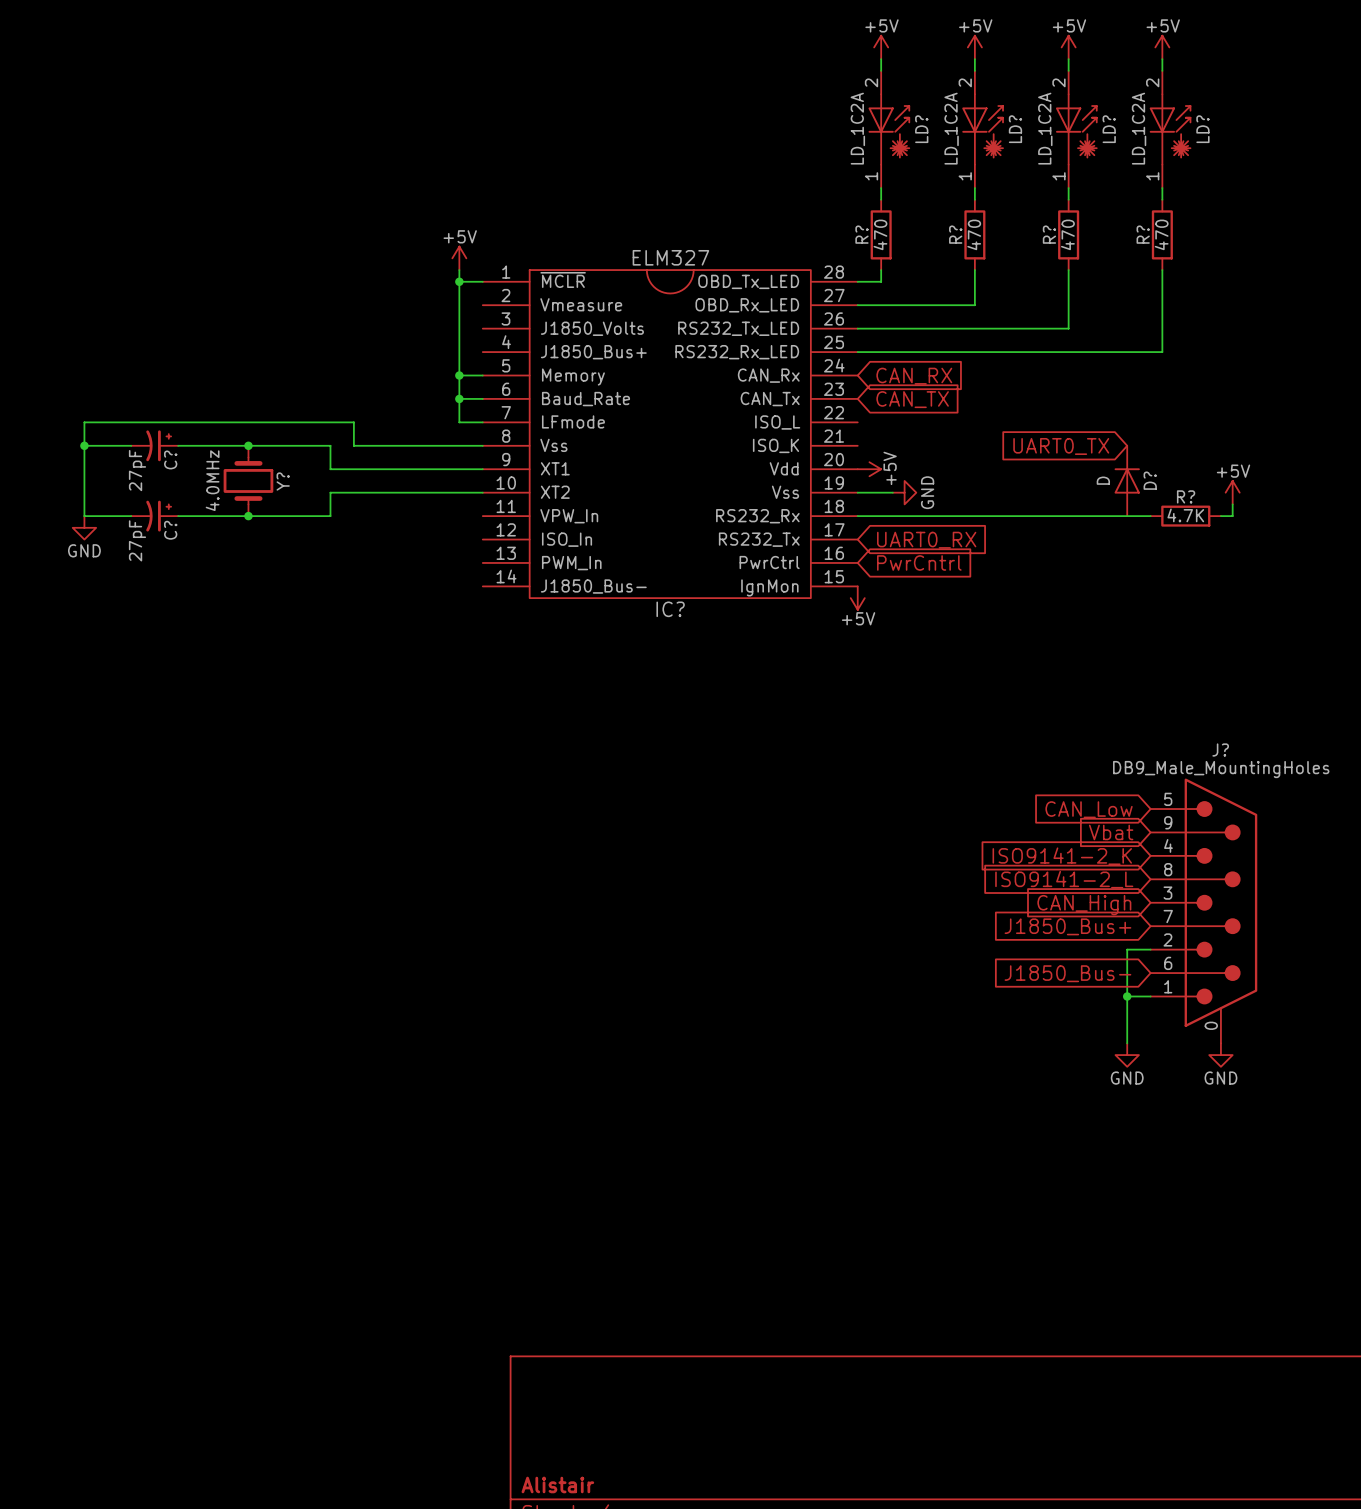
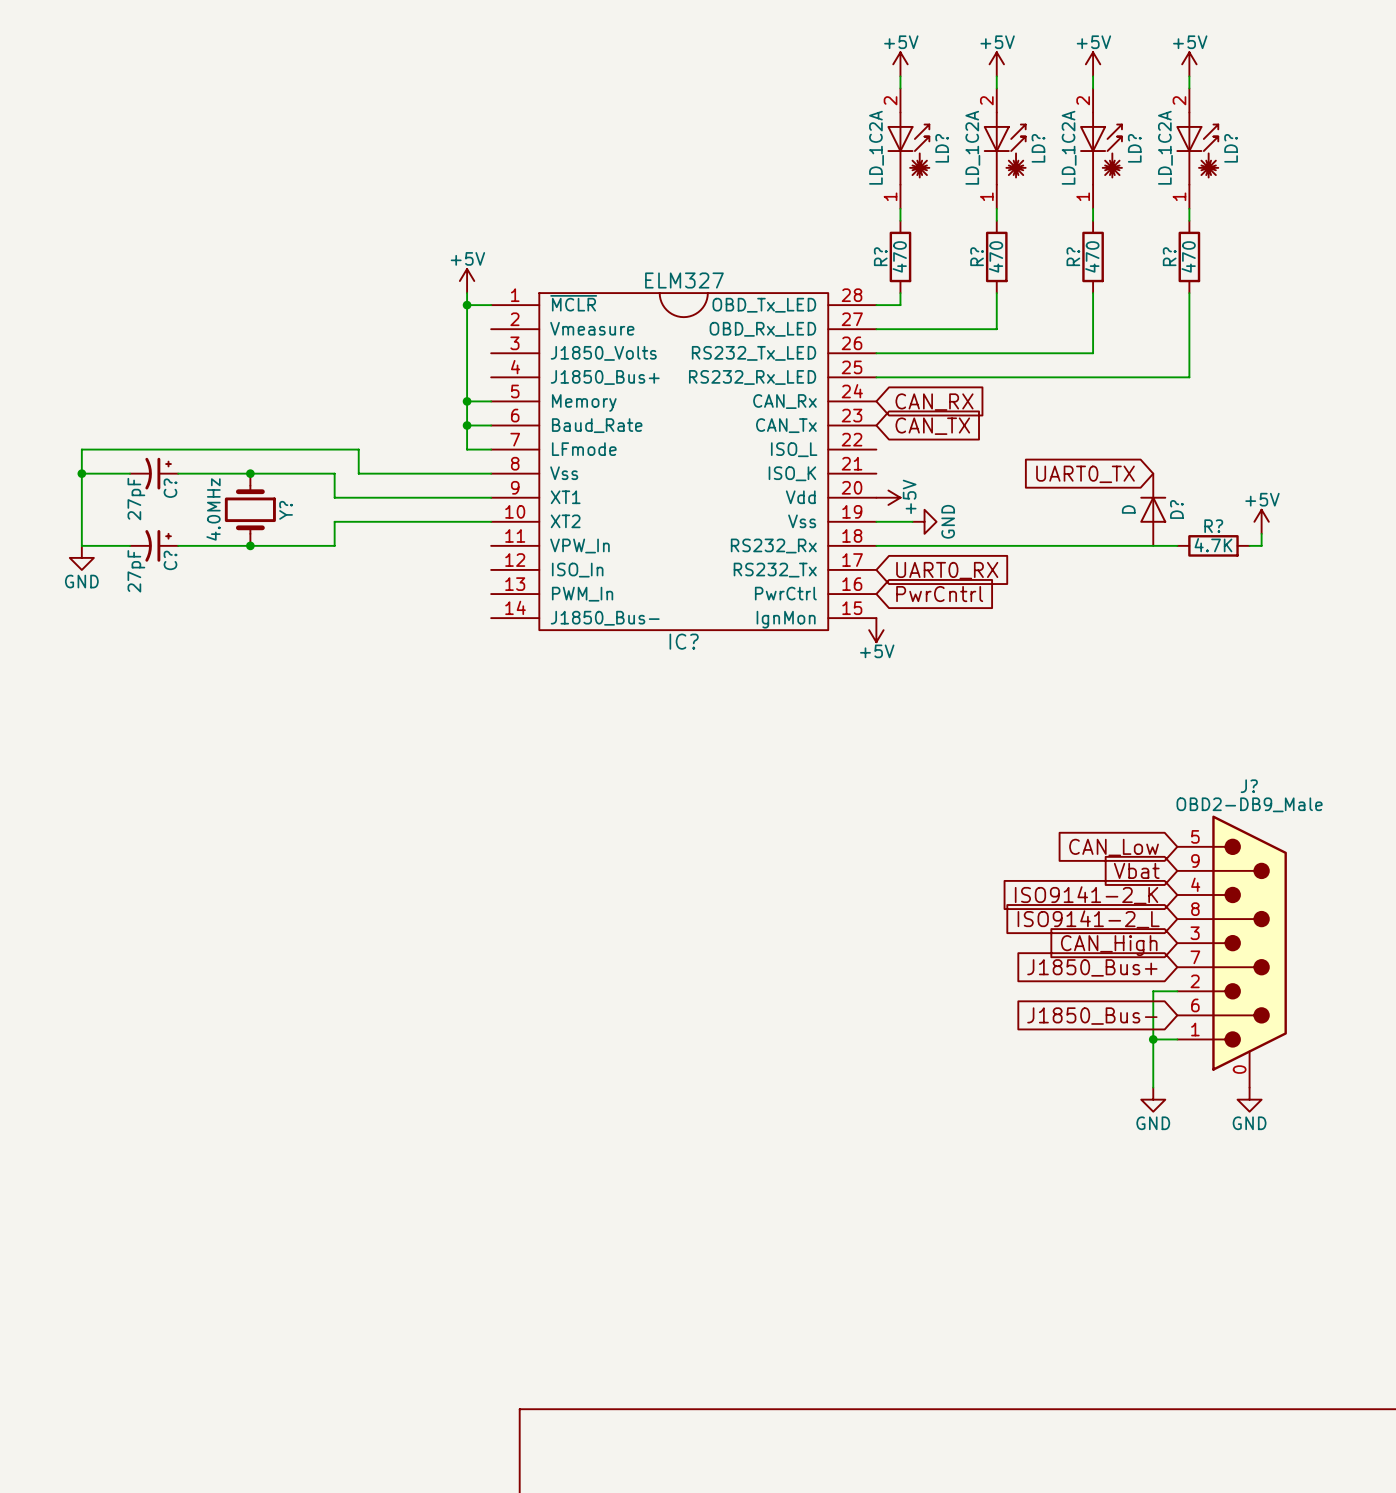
J? value: DB9_Male_MountingHoles (1221, 769) -> OBD2-DB9_Male (1249, 804)

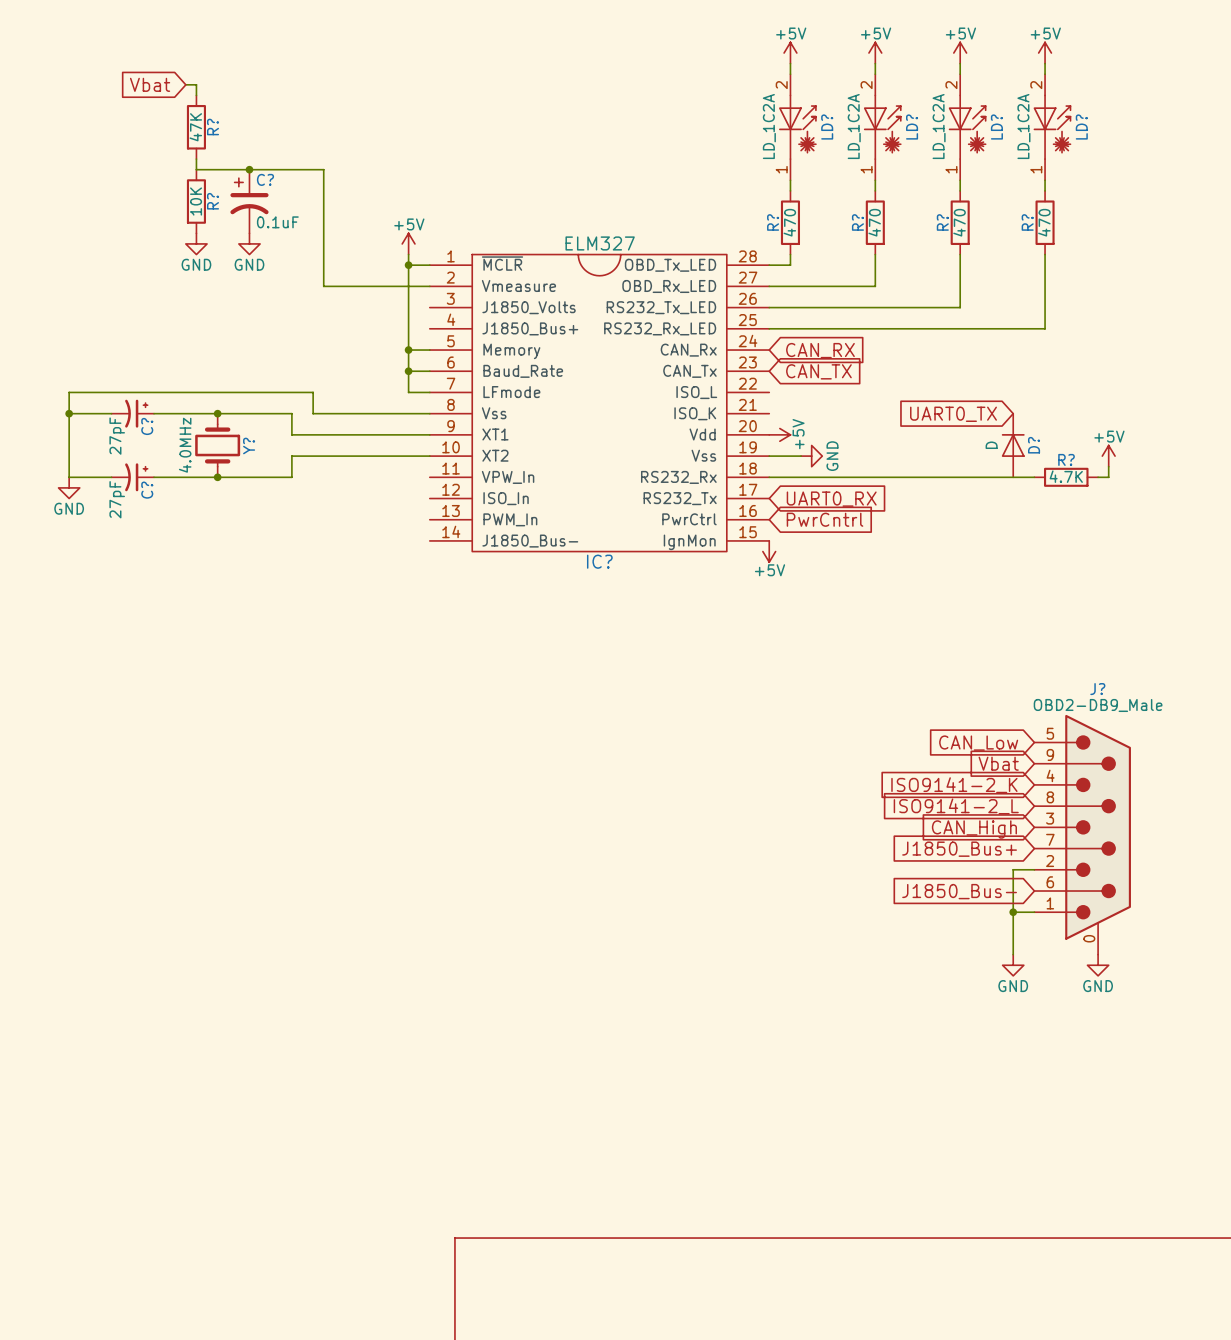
global label: none -> Vbat (150, 84)
wire: none -> (185, 84) (196, 84) (196, 95)
R?: none -> 47K (196, 127)
wire: none -> (196, 159) (196, 169) (323, 169) (323, 286) (429, 286)
junction: none -> (249, 169)
R?: none -> 10K (196, 201)
C?: none -> 0.1uF (249, 201)
power symbol: none -> GND (196, 243)
power symbol: none -> GND (249, 243)

